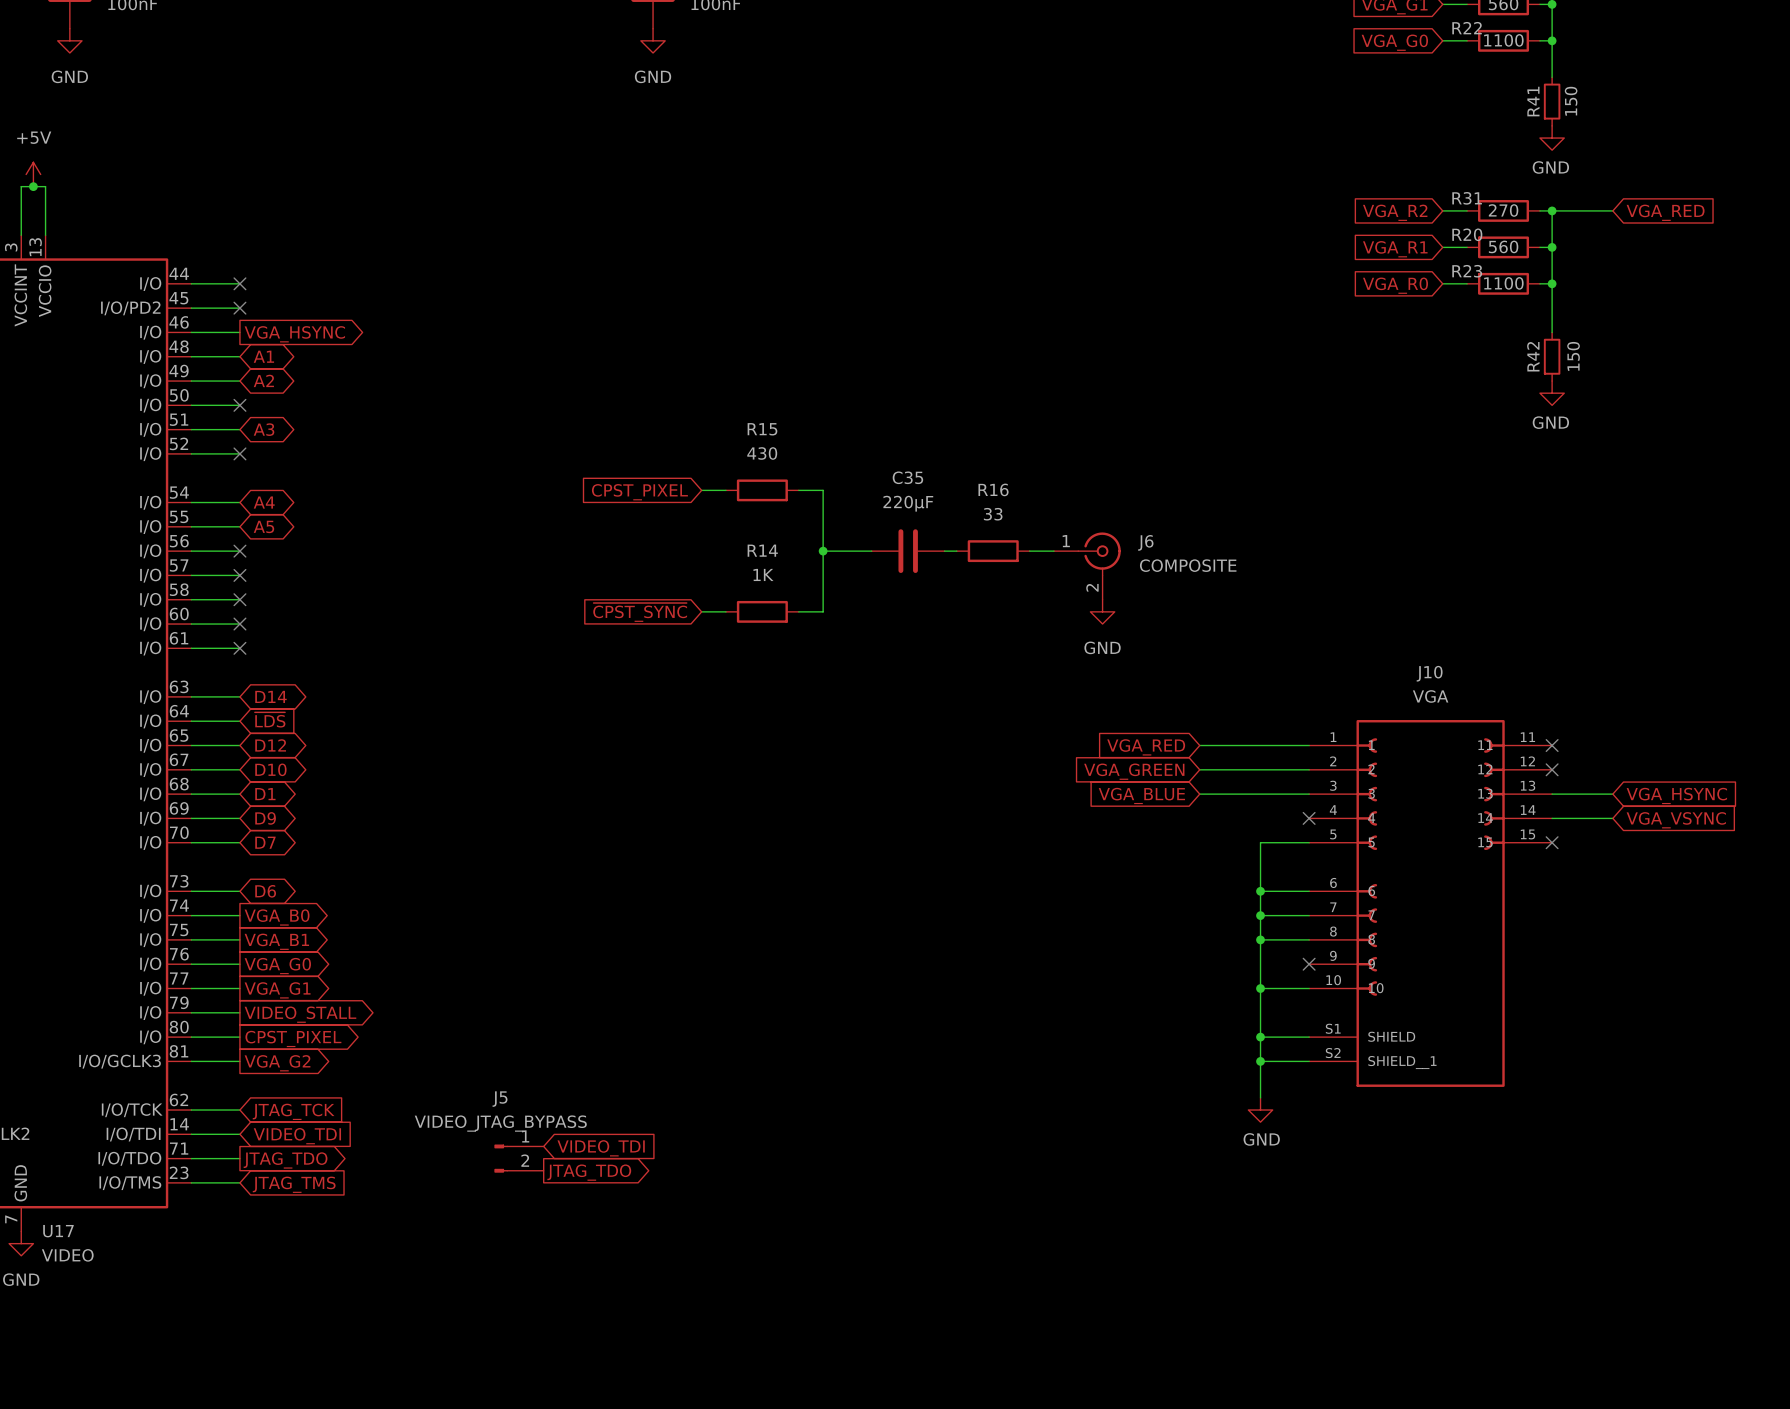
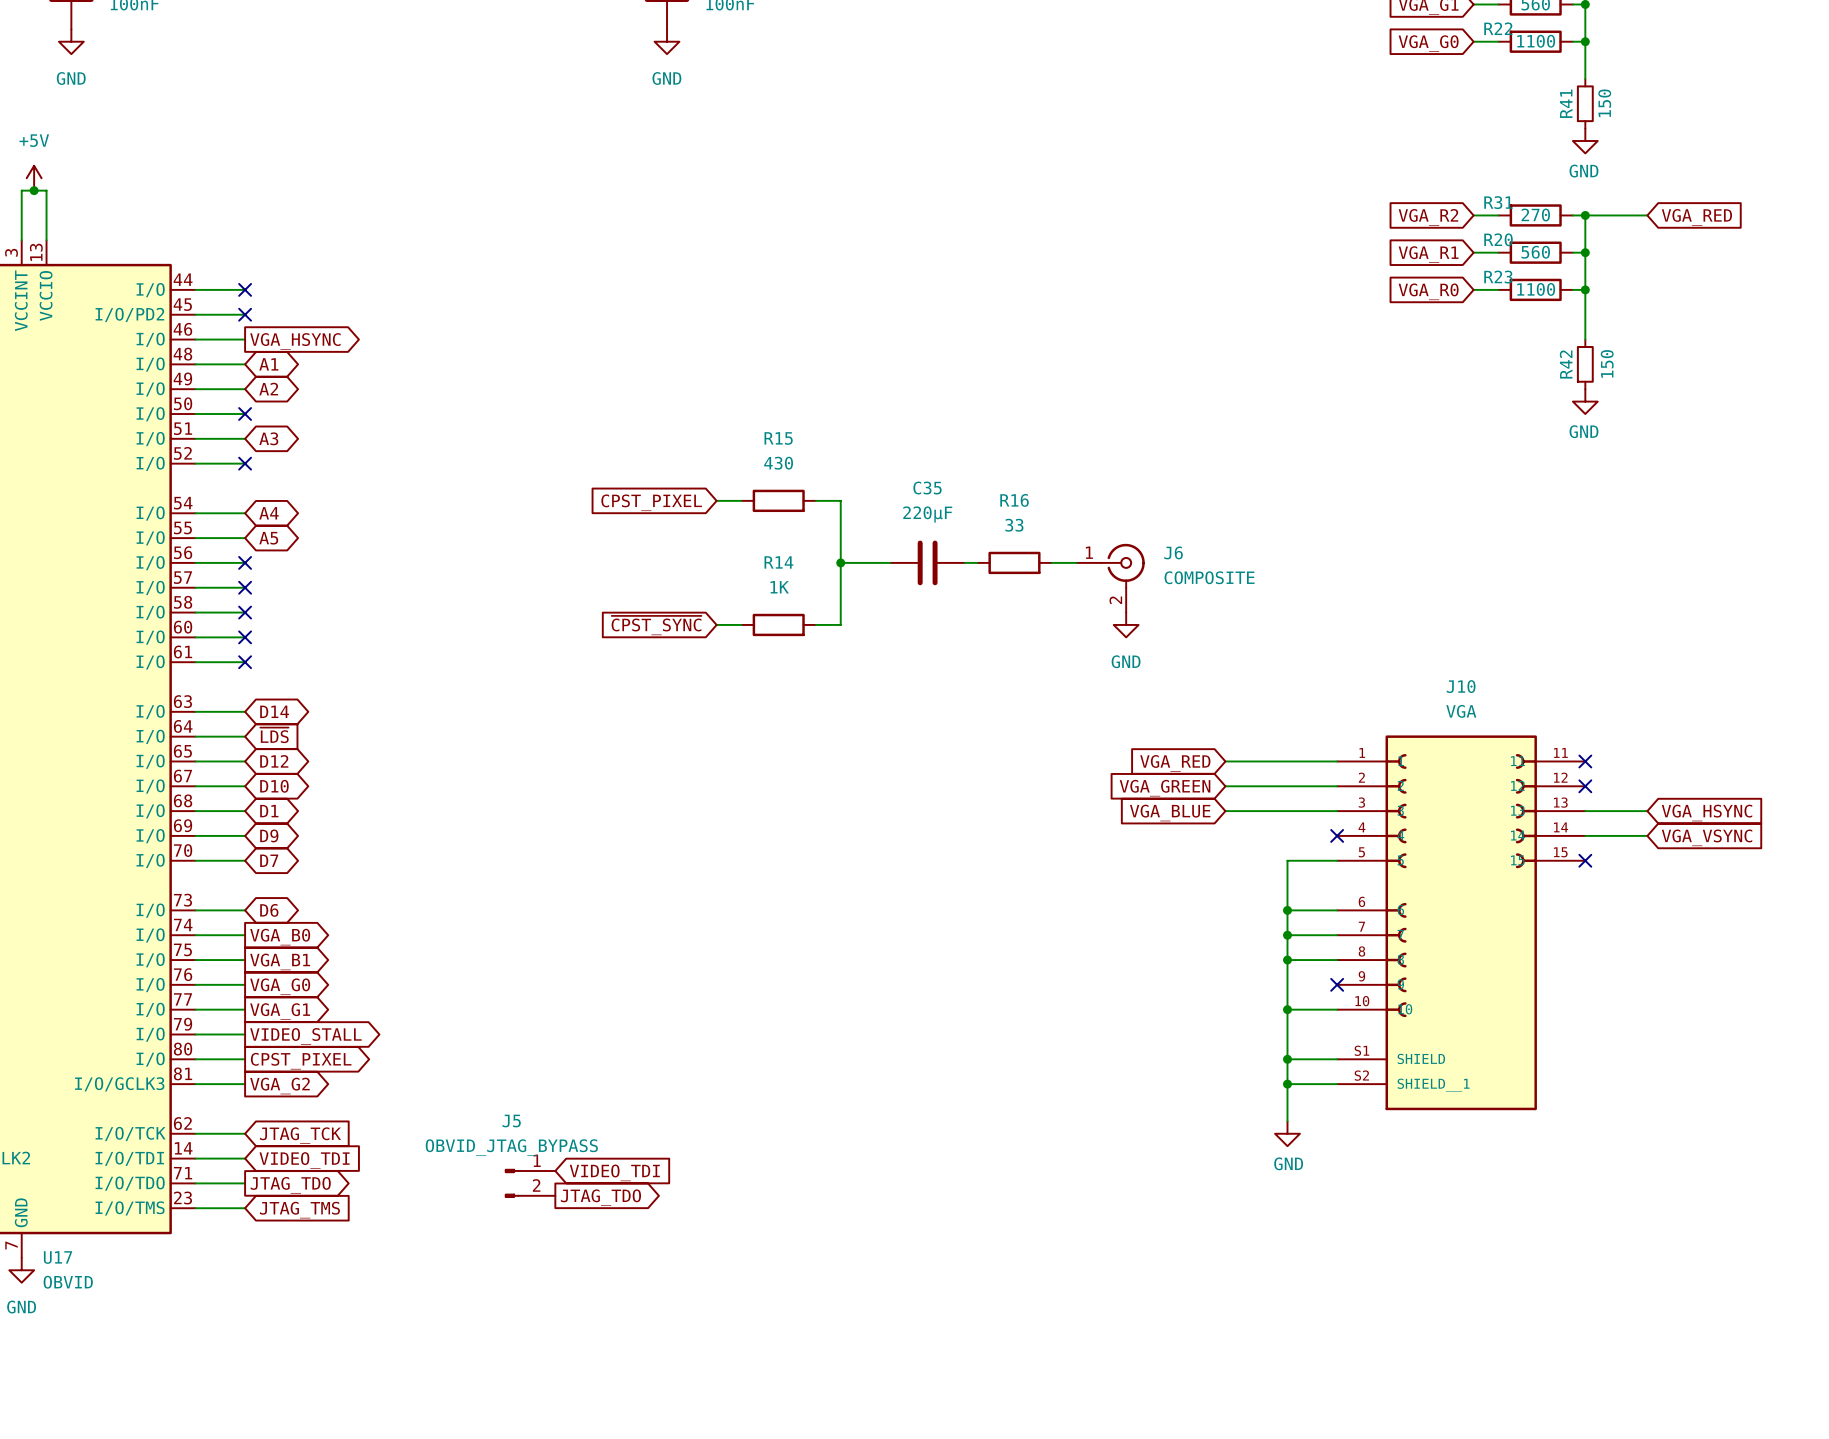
J5 value: VIDEO_JTAG_BYPASS (500, 1123) -> OBVID_JTAG_BYPASS (511, 1147)
U17 value: VIDEO (67, 1255) -> OBVID (68, 1282)

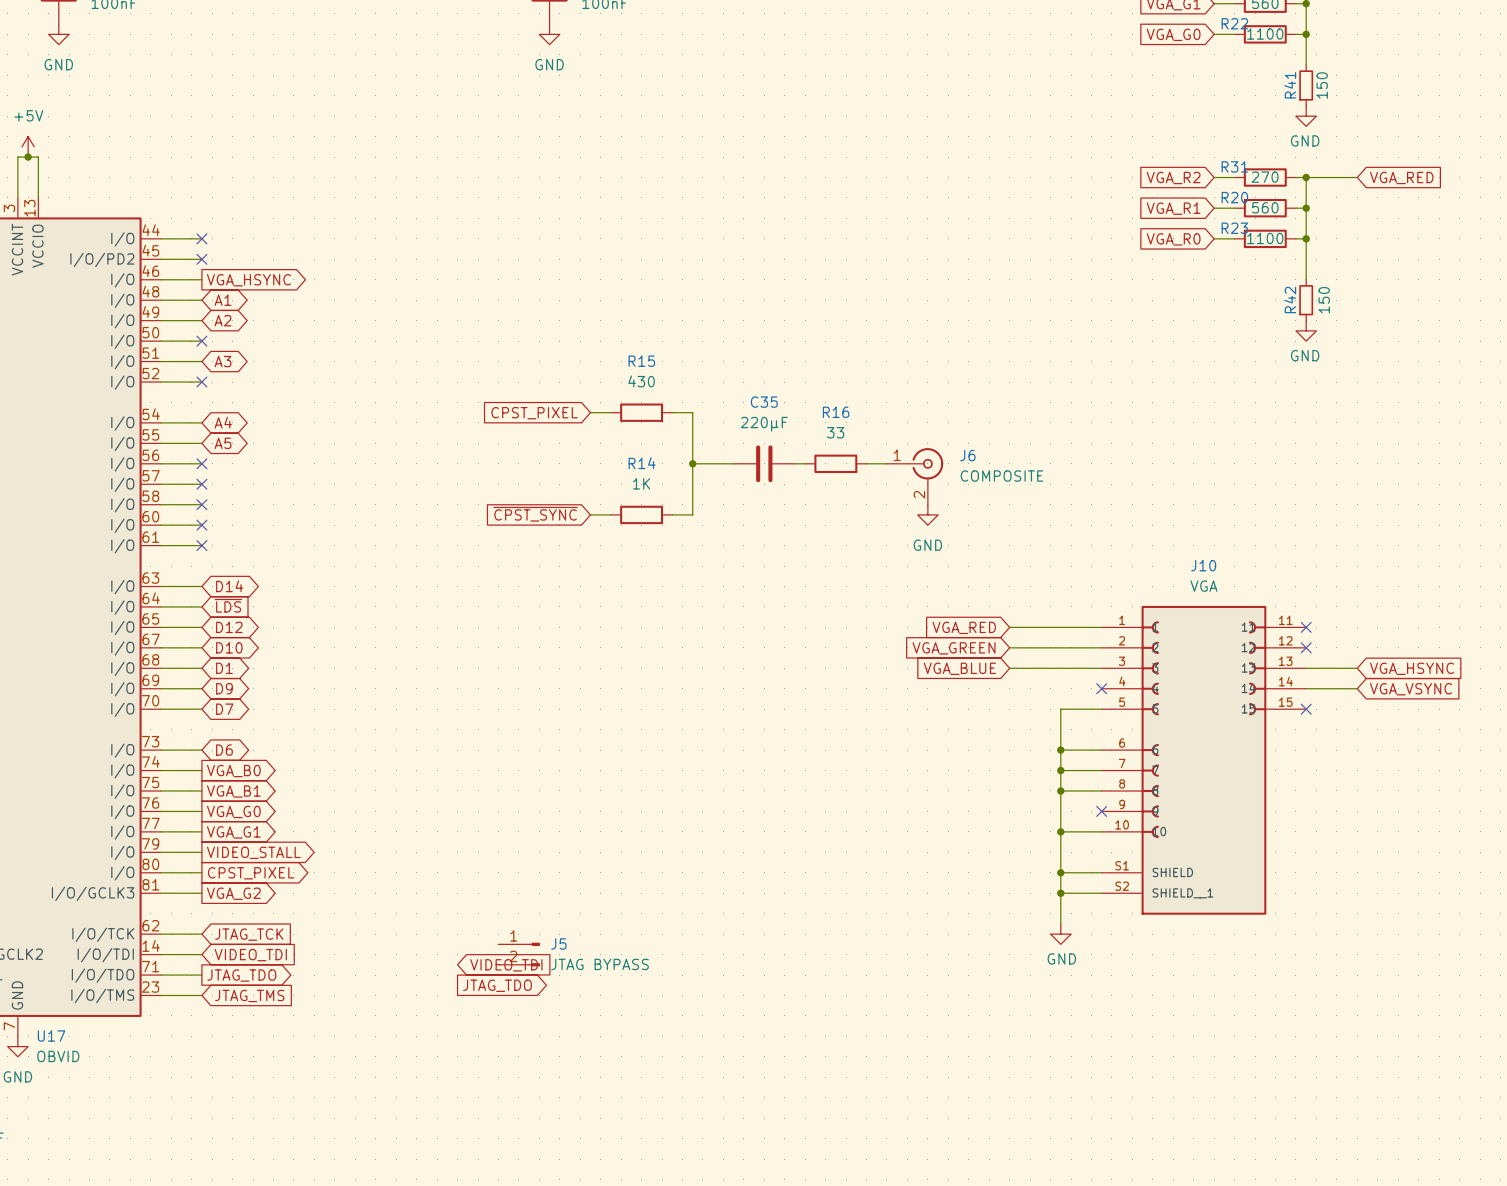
J5 name position: J5 (511, 1121) -> J5 (558, 943)
J5 value: OBVID_JTAG_BYPASS (511, 1147) -> JTAG BYPASS (600, 964)
J5 flip: as is (511, 1183) -> left-right (534, 954)
J5 position: (530, 1183) -> (519, 954)

